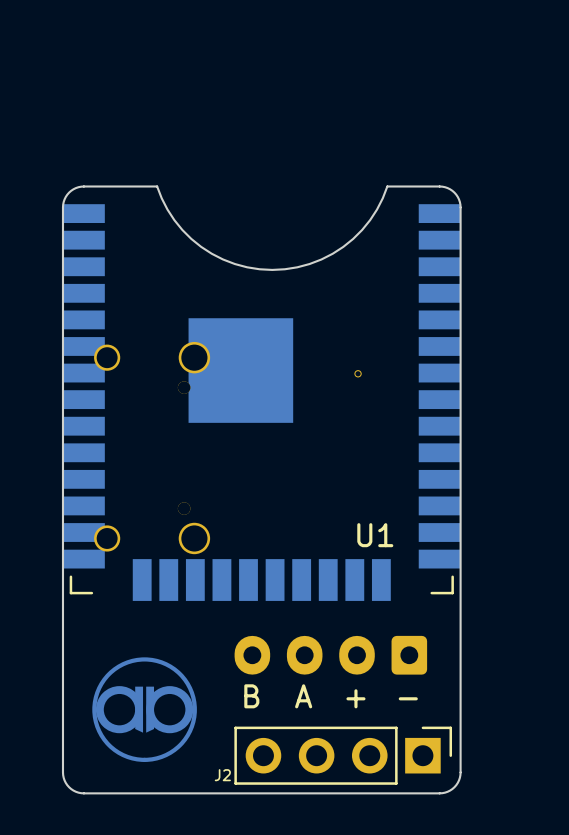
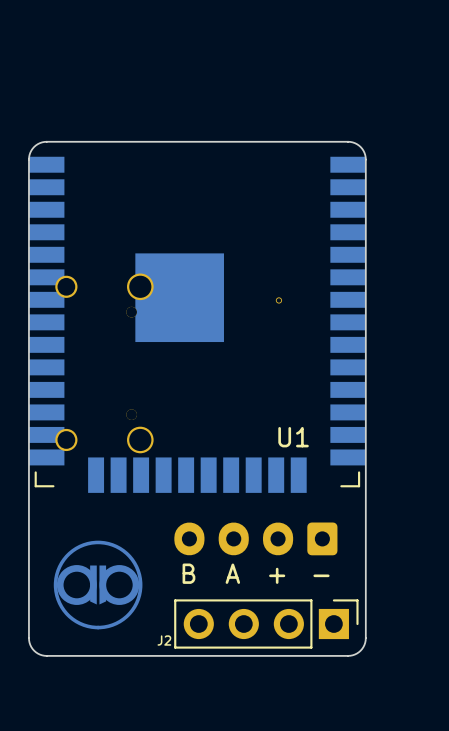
board edge: (387, 186) (370, 220) (343, 246) (309, 264) (272, 269) (234, 264) (201, 246) (174, 220) (157, 186) -> (303, 141) (108, 141)

